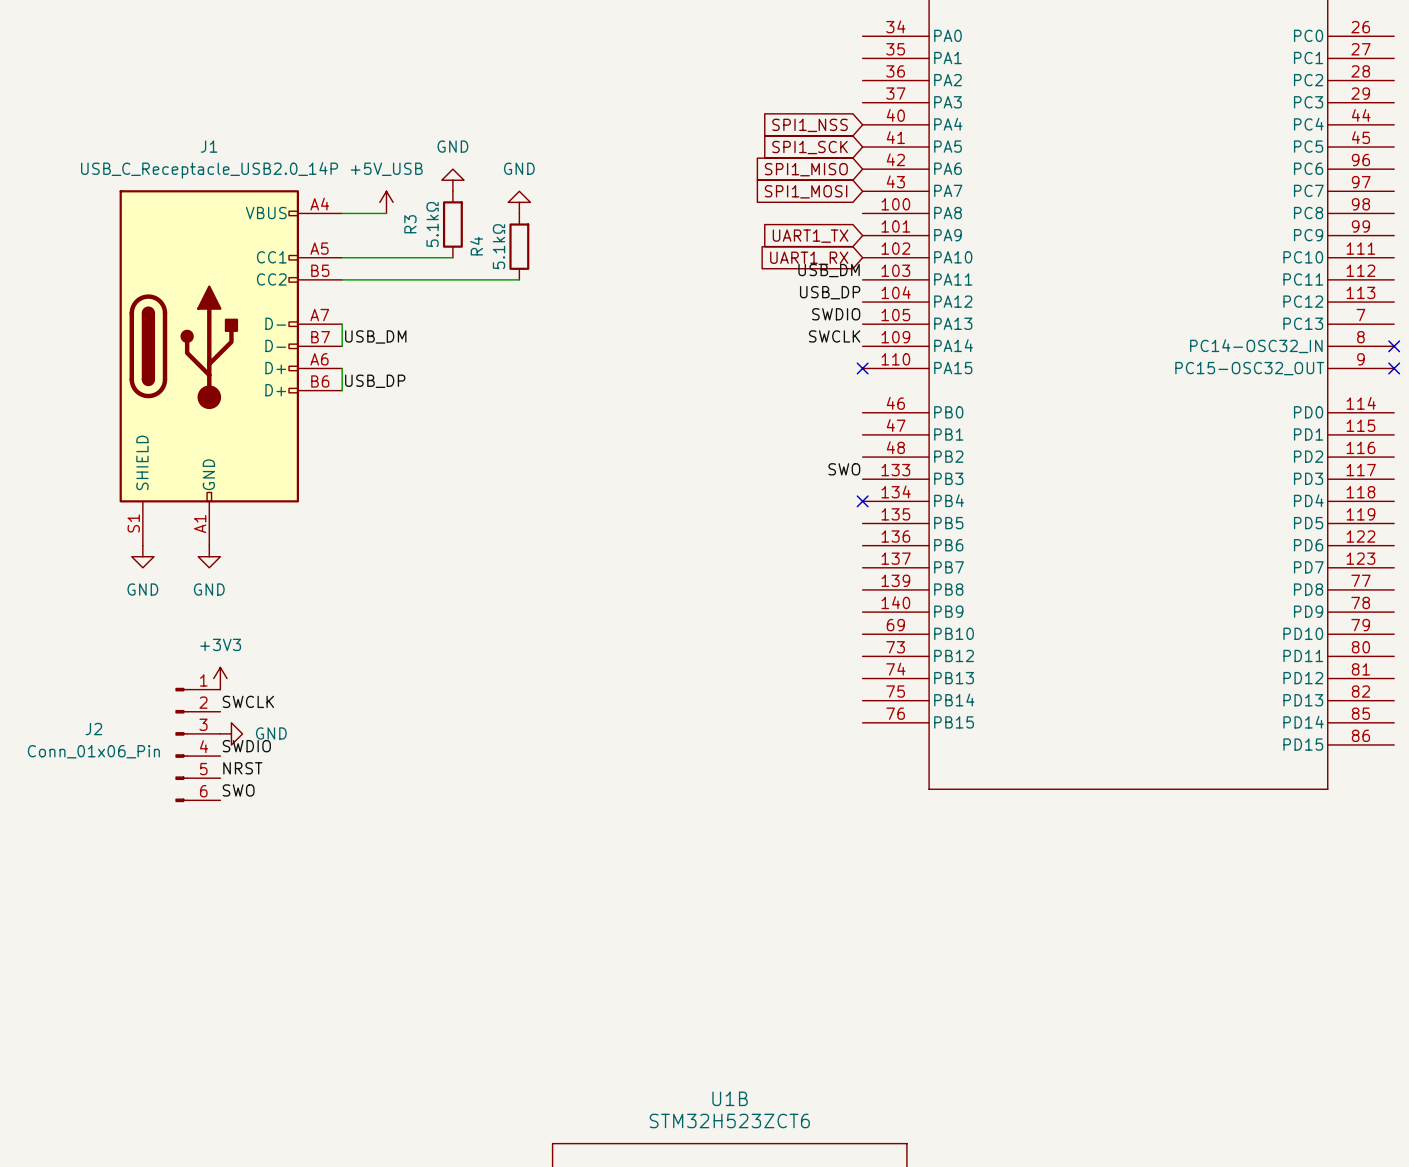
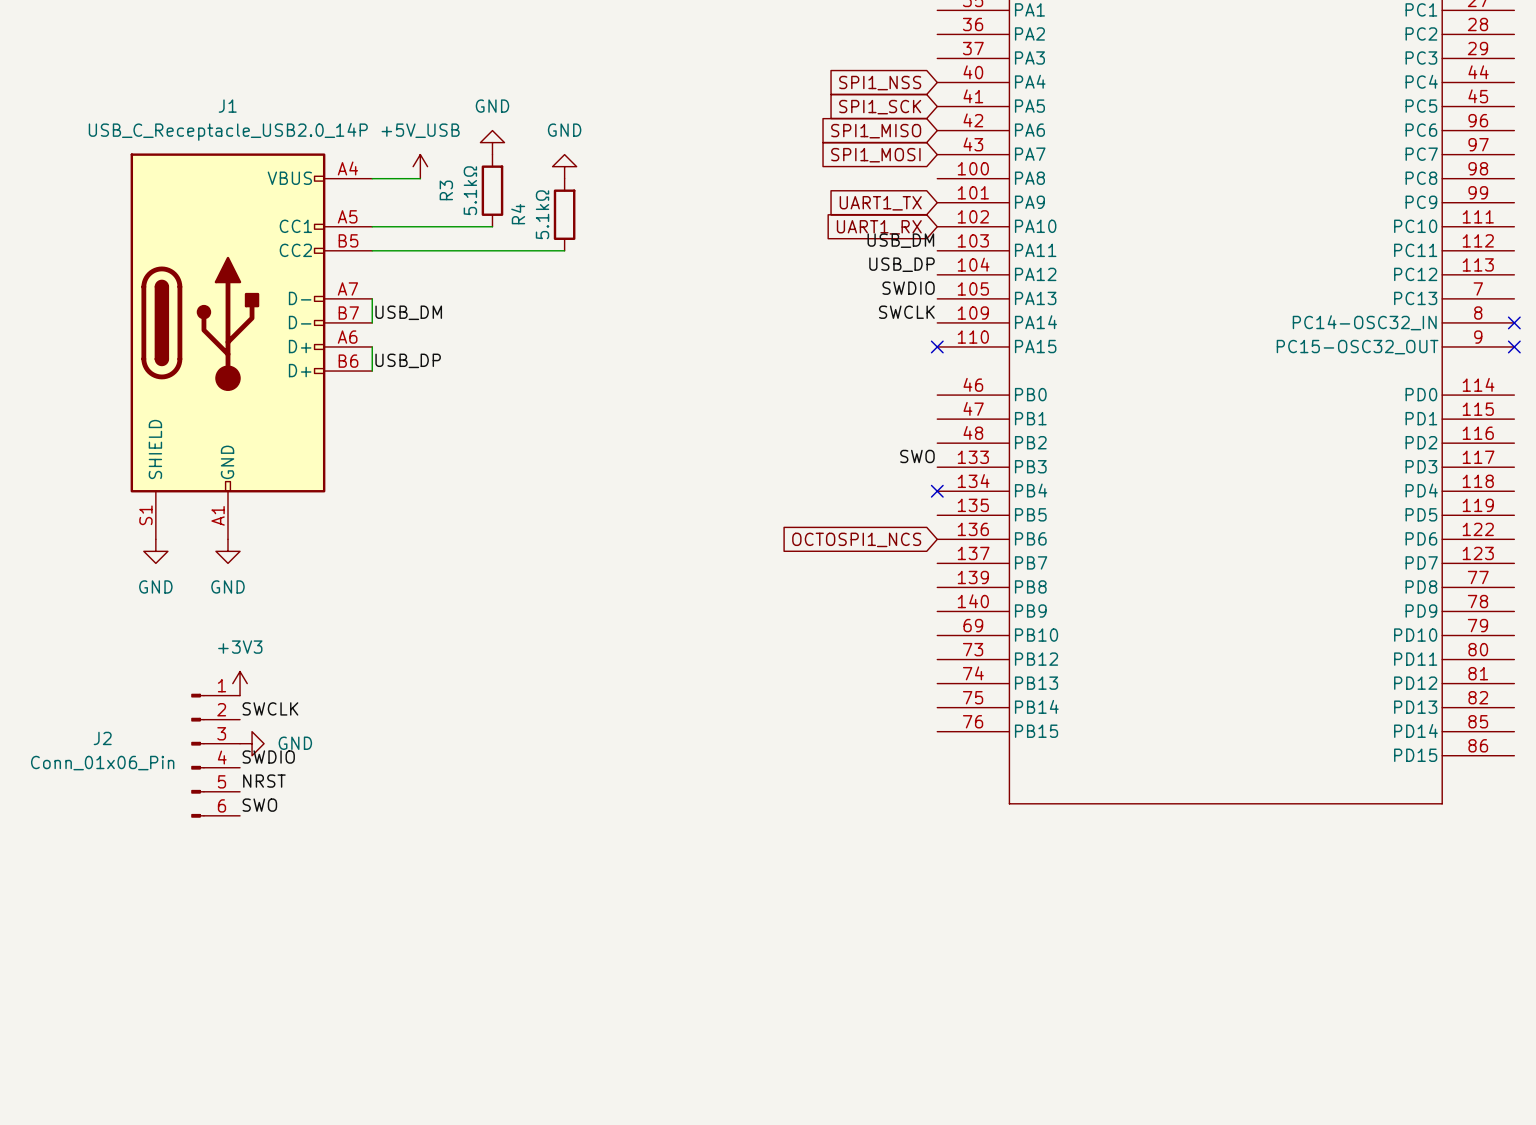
global label: none -> OCTOSPI1_NCS (856, 539)

